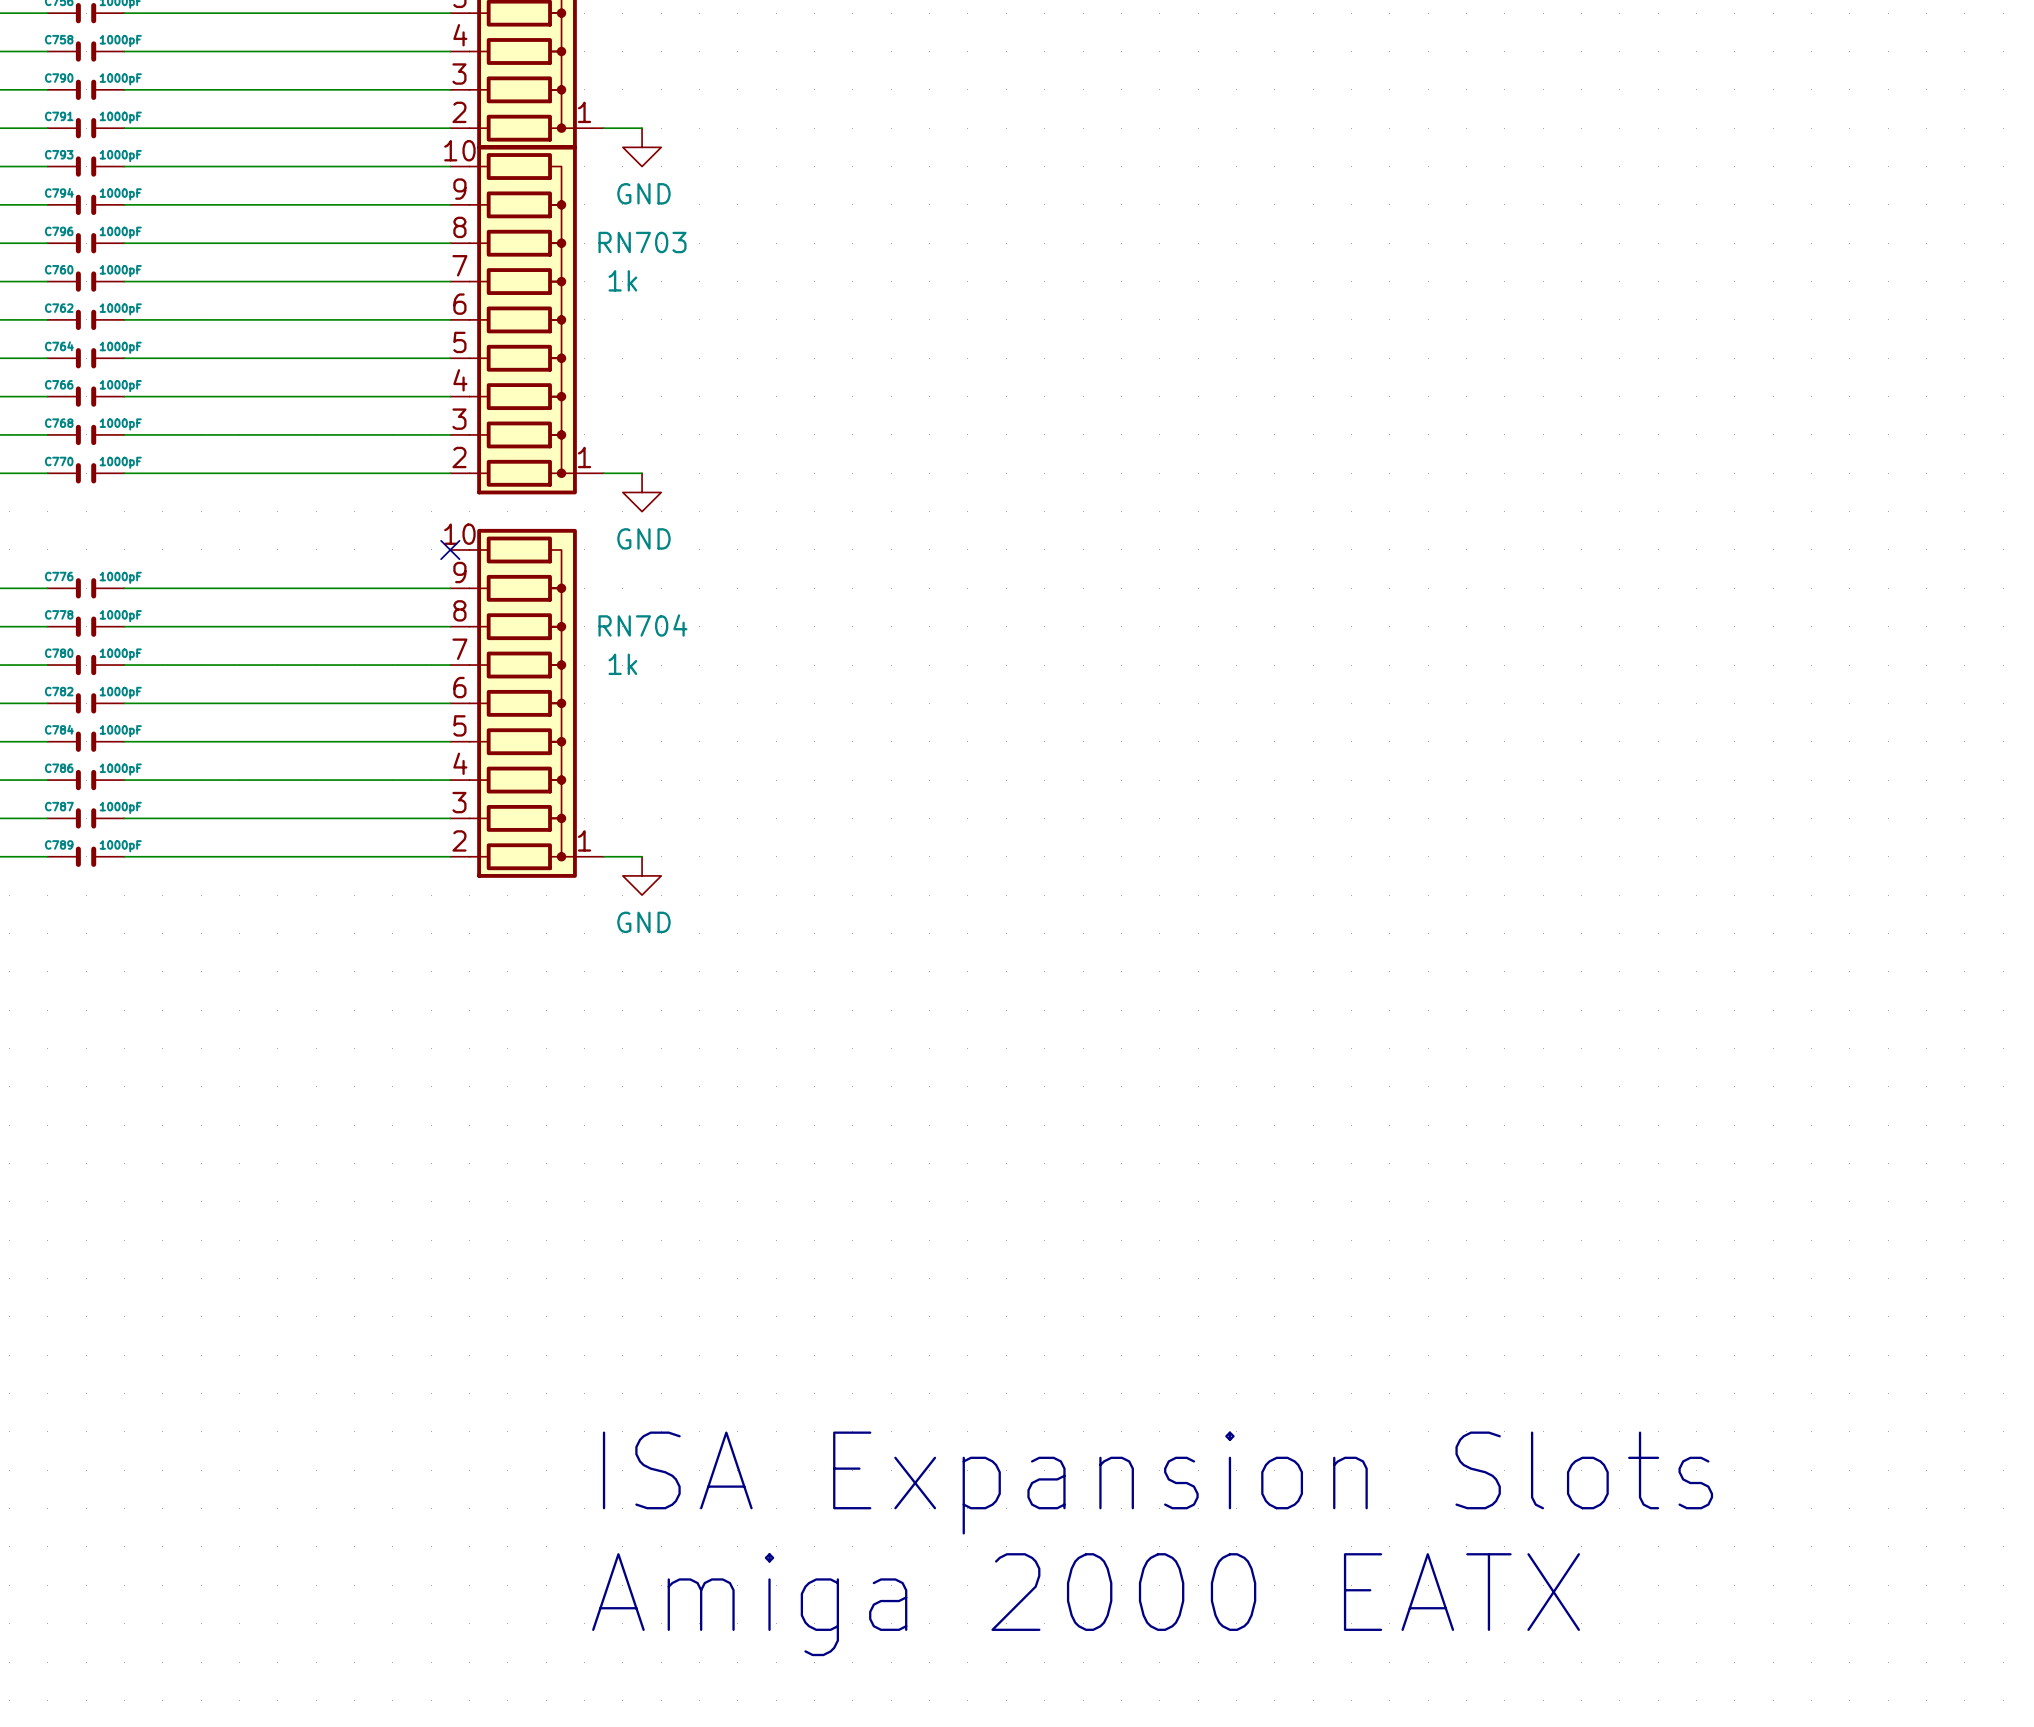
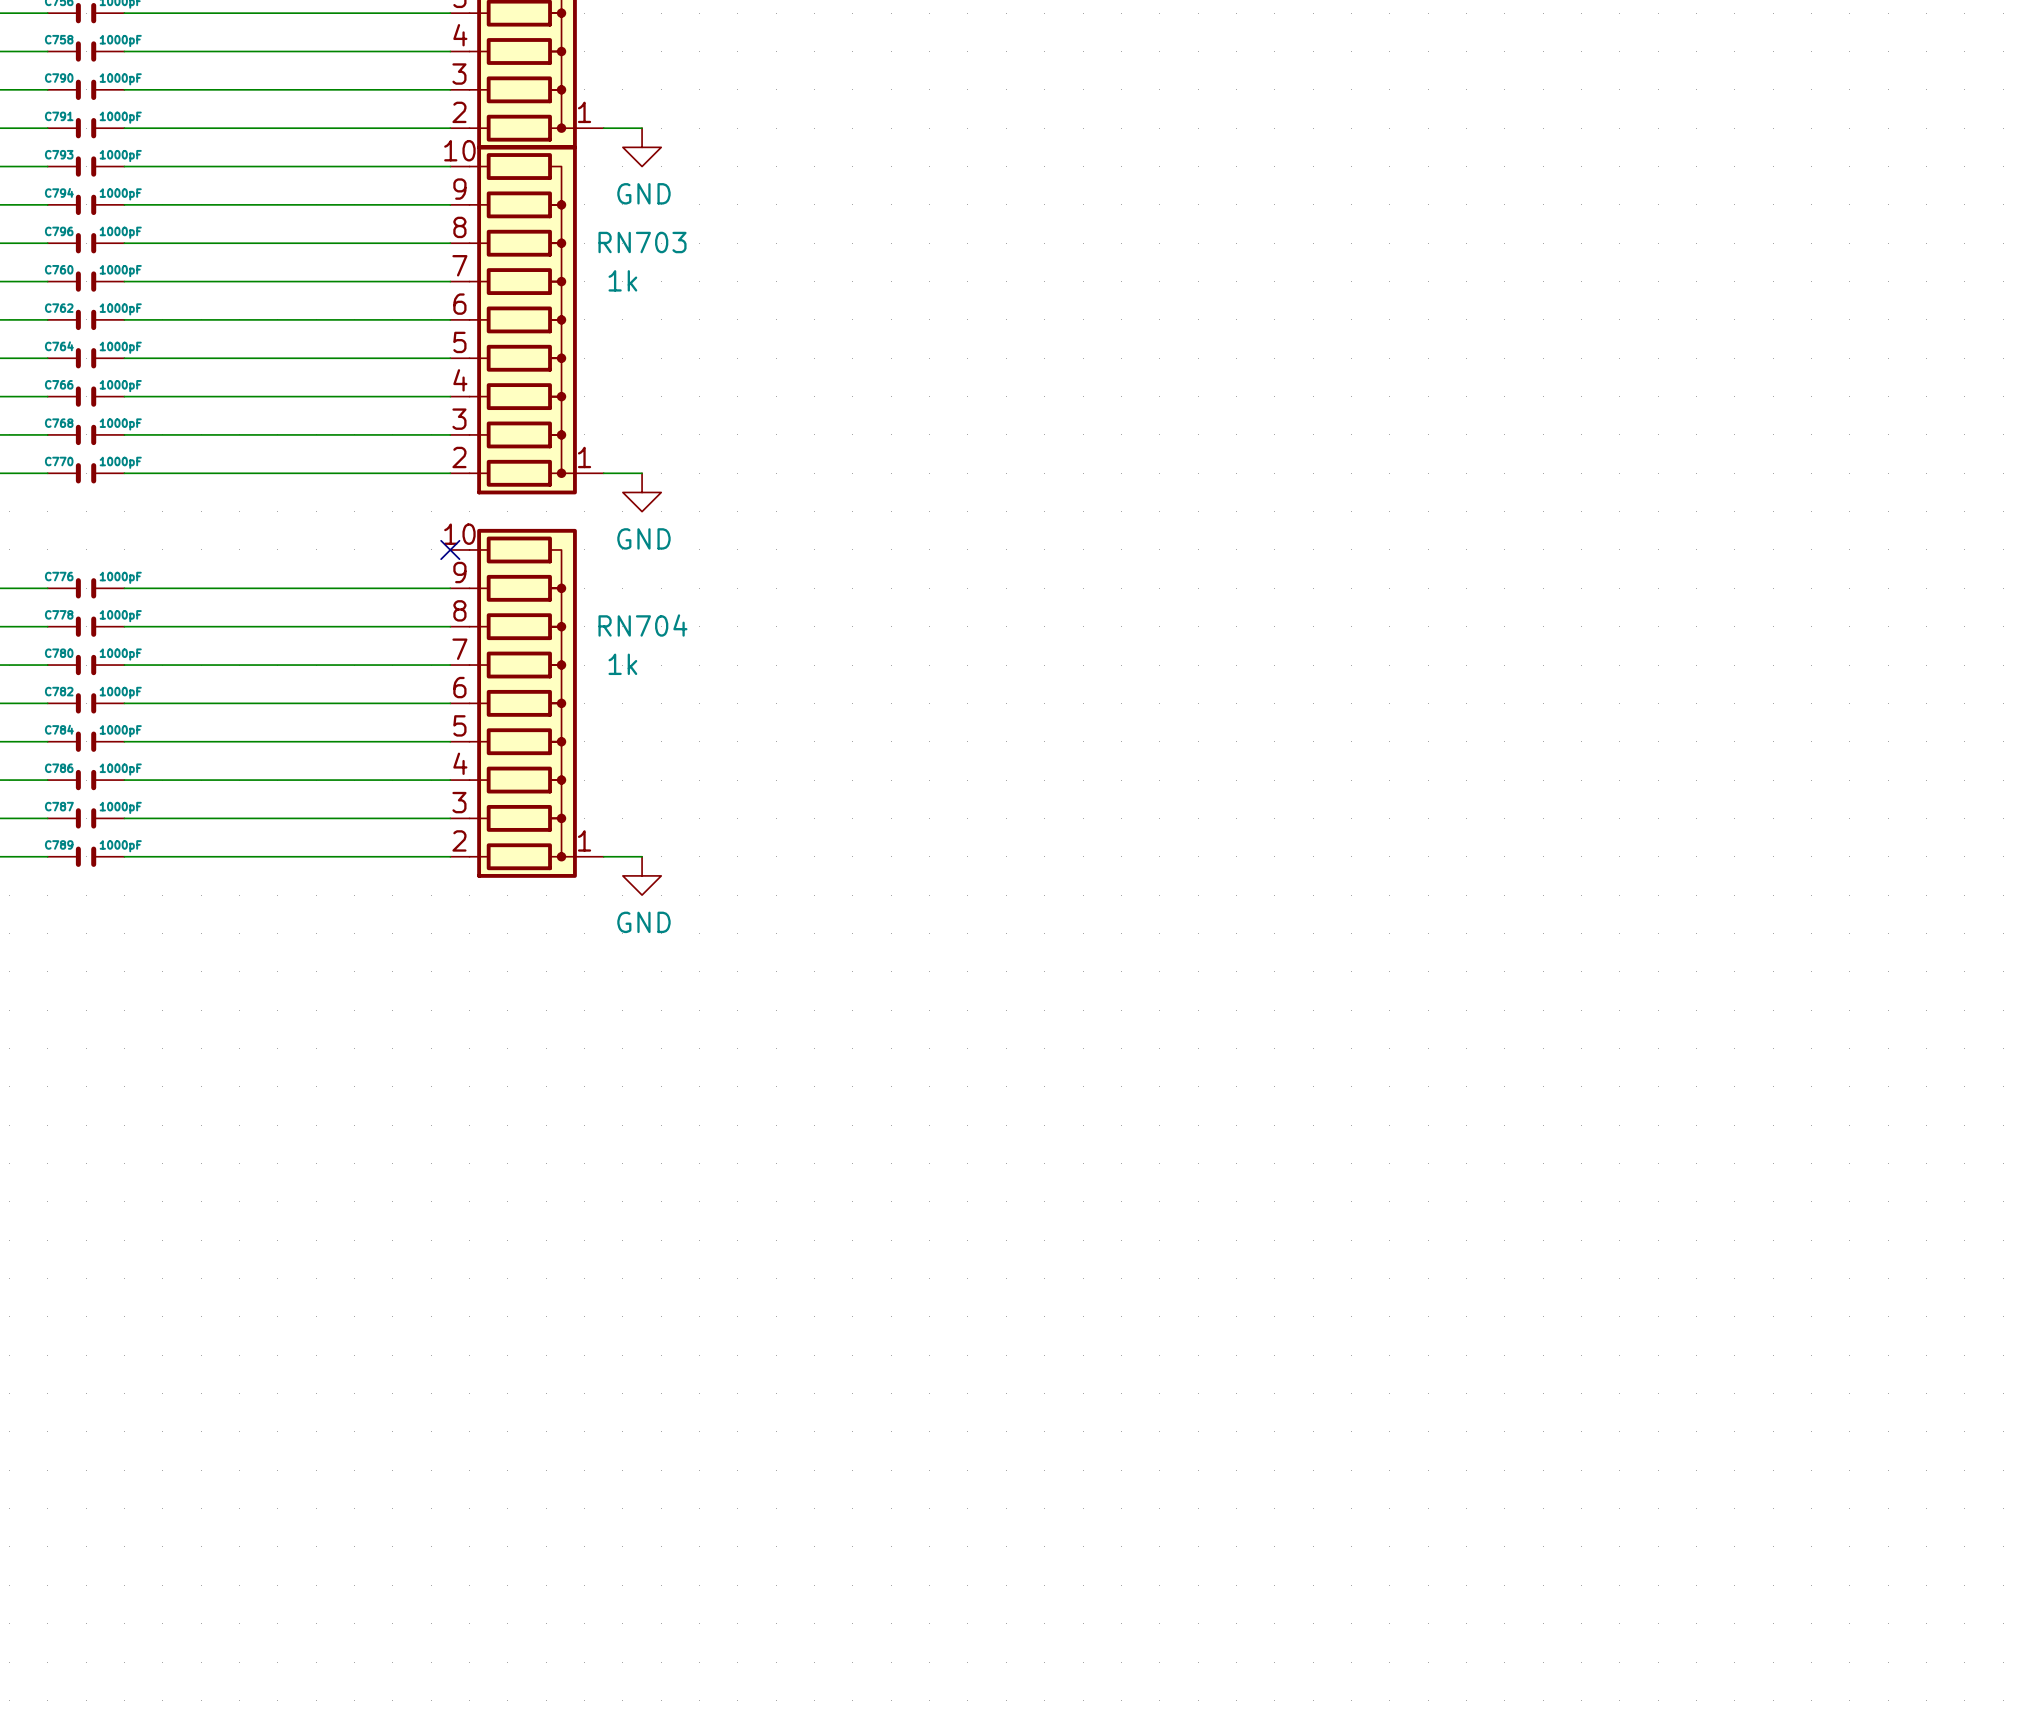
text: ISA Expansion Slots (1158, 1483) -> none
text: Amiga 2000 EATX (1086, 1604) -> none

